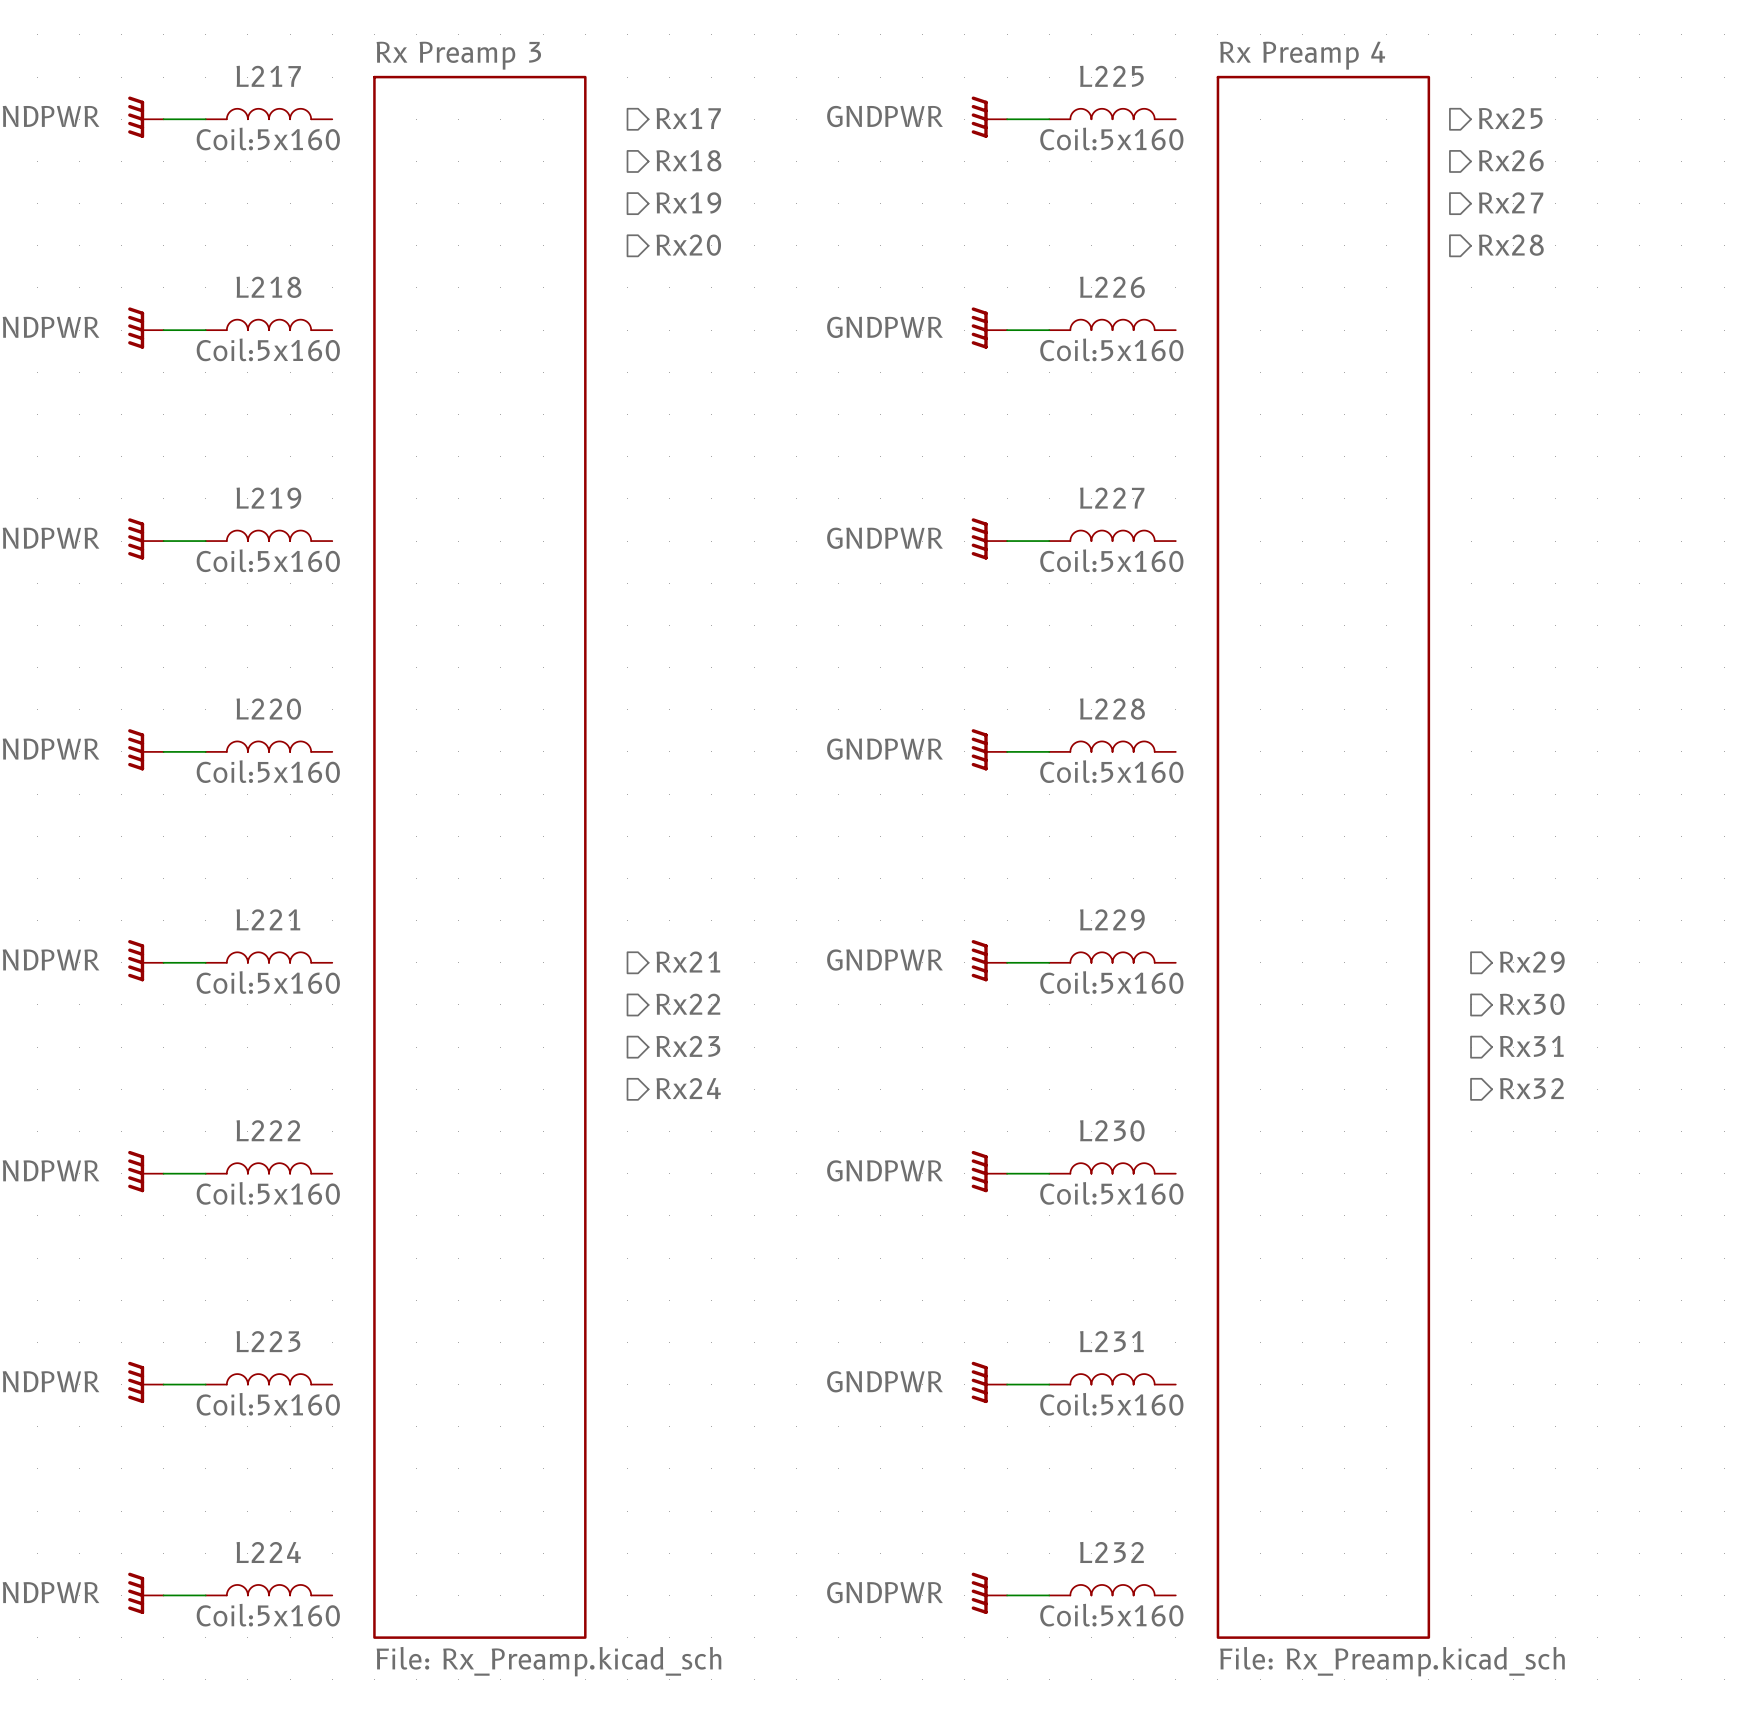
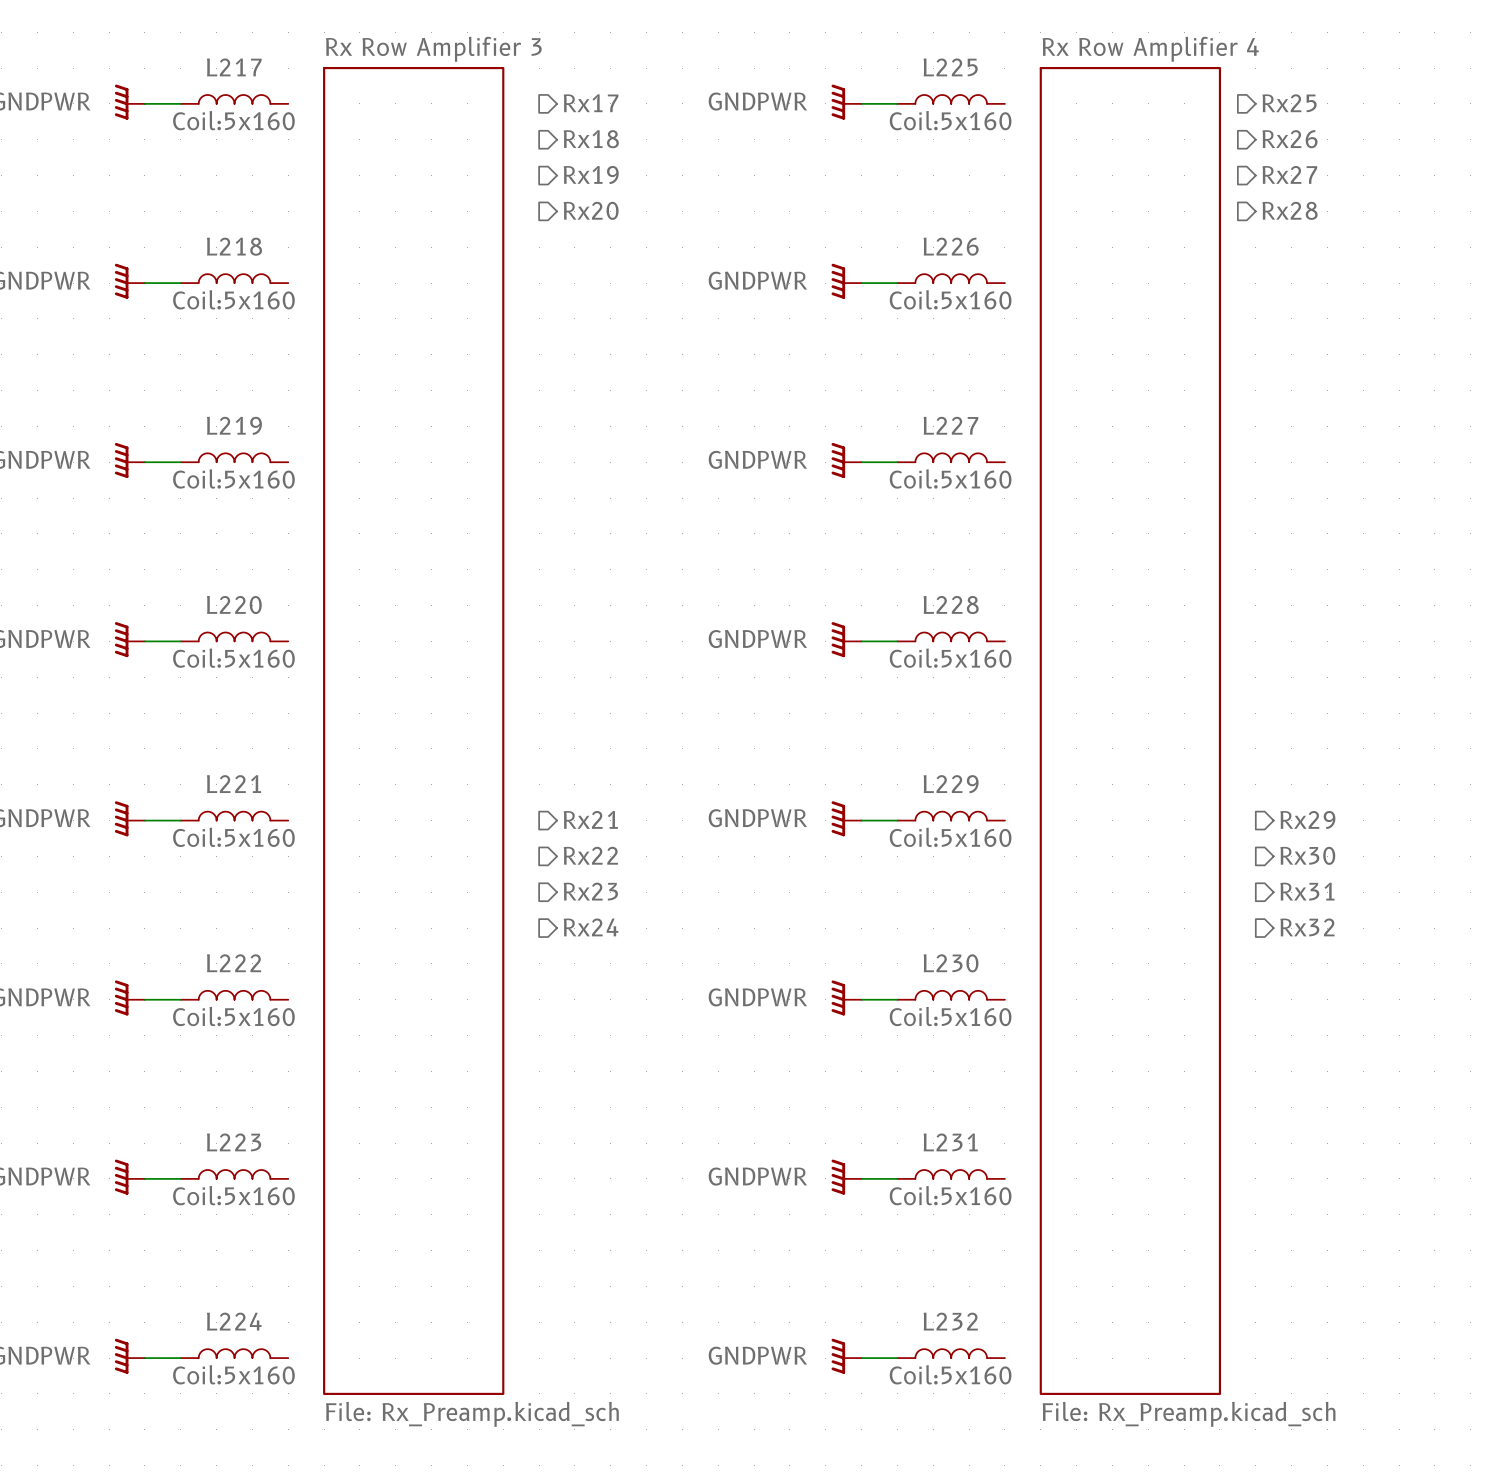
sheet Rx Preamp 3 name: Rx Preamp 3 (458, 55) -> Rx Row Amplifier 3 (433, 49)
sheet Rx Preamp 4 name: Rx Preamp 4 (1302, 55) -> Rx Row Amplifier 4 (1150, 49)

